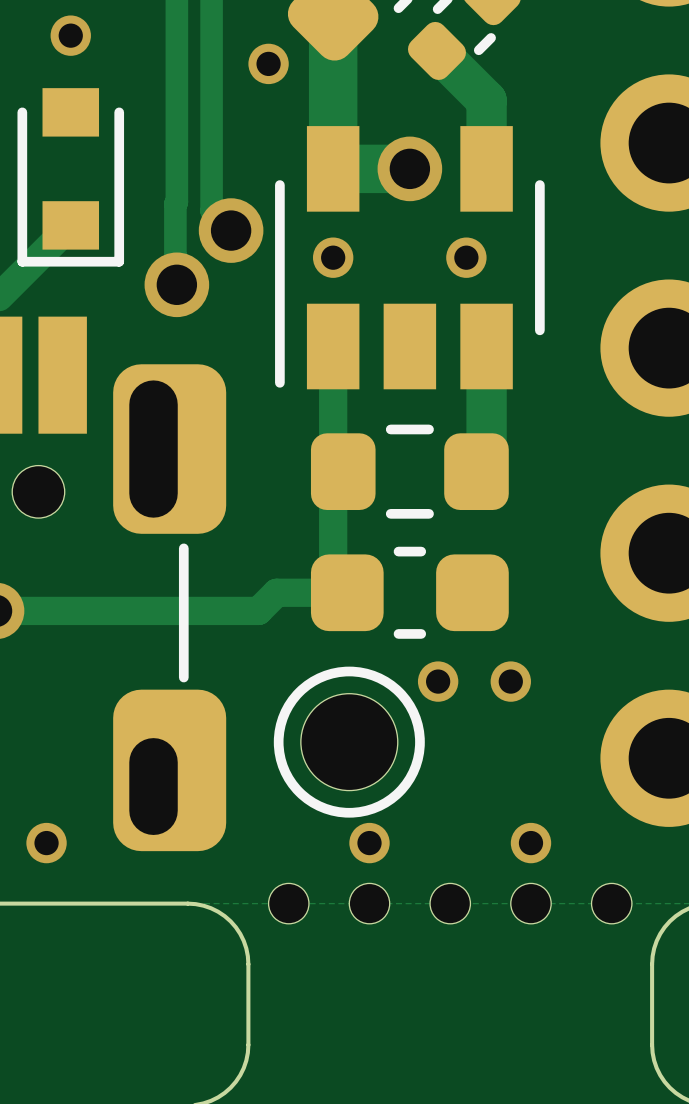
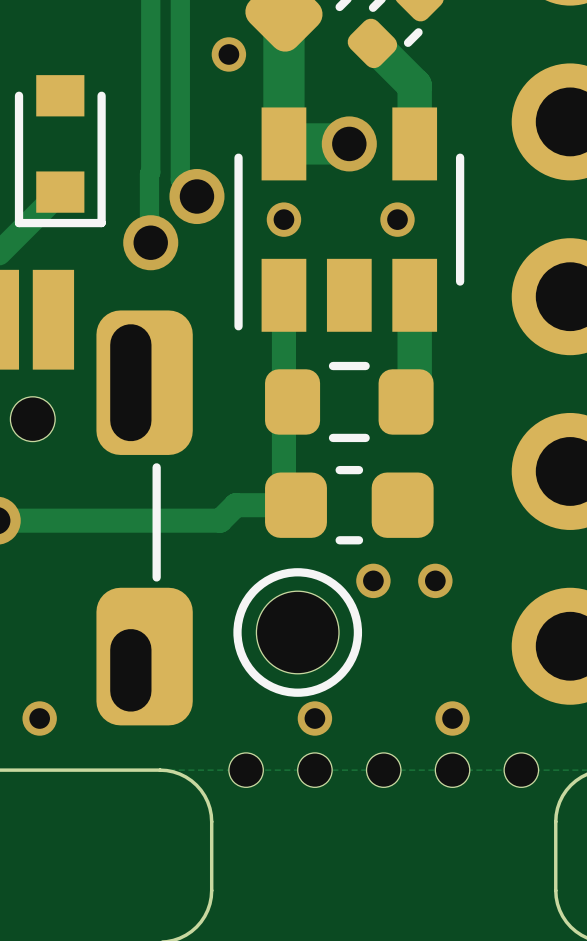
via: (70, 35) -> none

